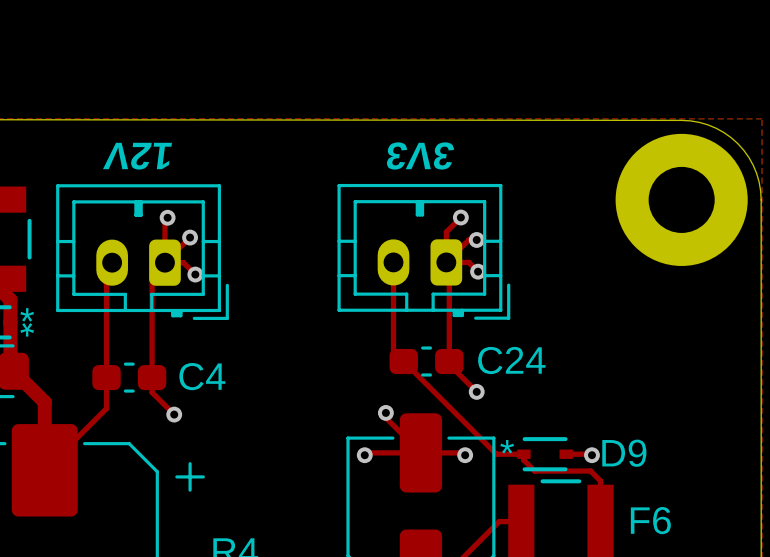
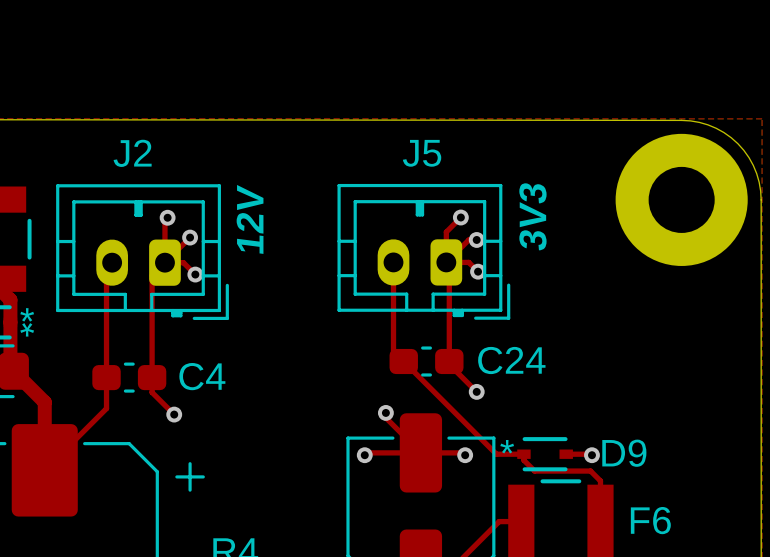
J2 name: none -> J2 (132, 153)
J5 name: none -> J5 (422, 153)
text rotation: 0° (420, 155) -> 90° clockwise (532, 216)
text position: 3V3 (420, 155) -> 3V3 (532, 216)
text rotation: 0° (137, 156) -> 90° clockwise (250, 219)
text position: 12V (137, 156) -> 12V (250, 219)

